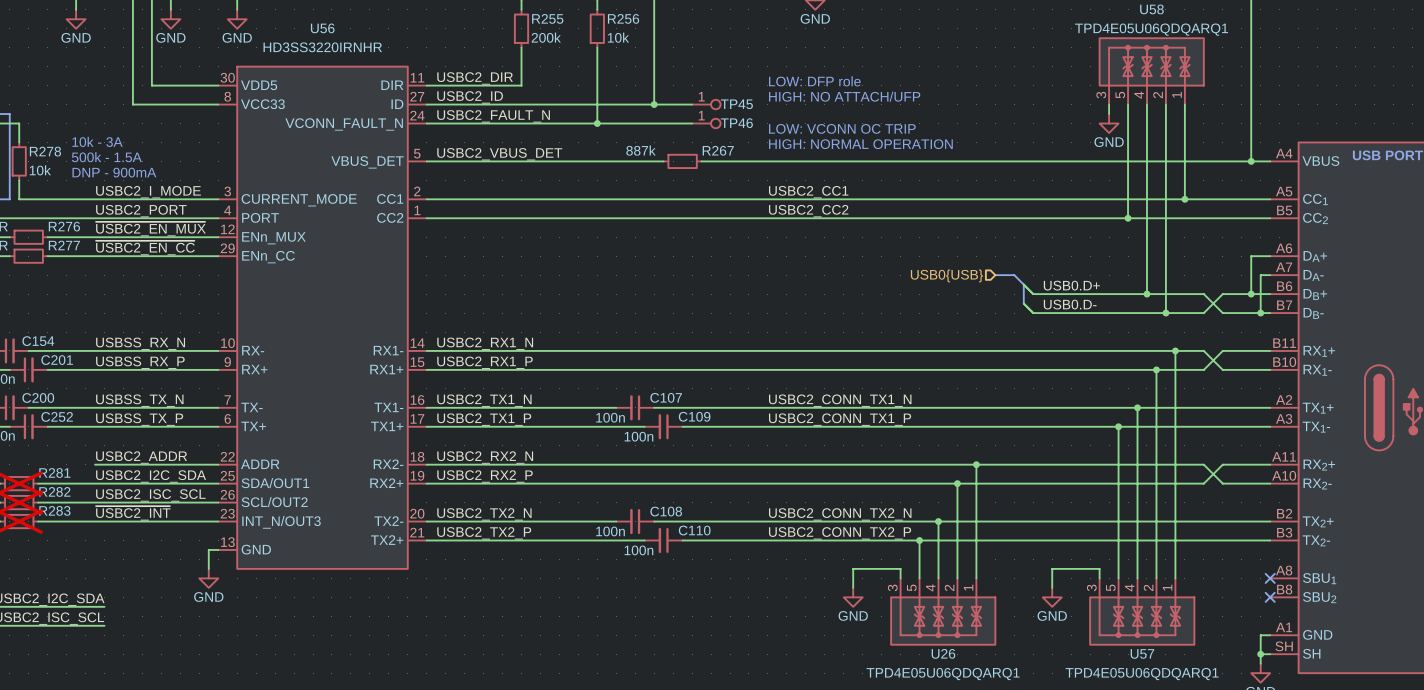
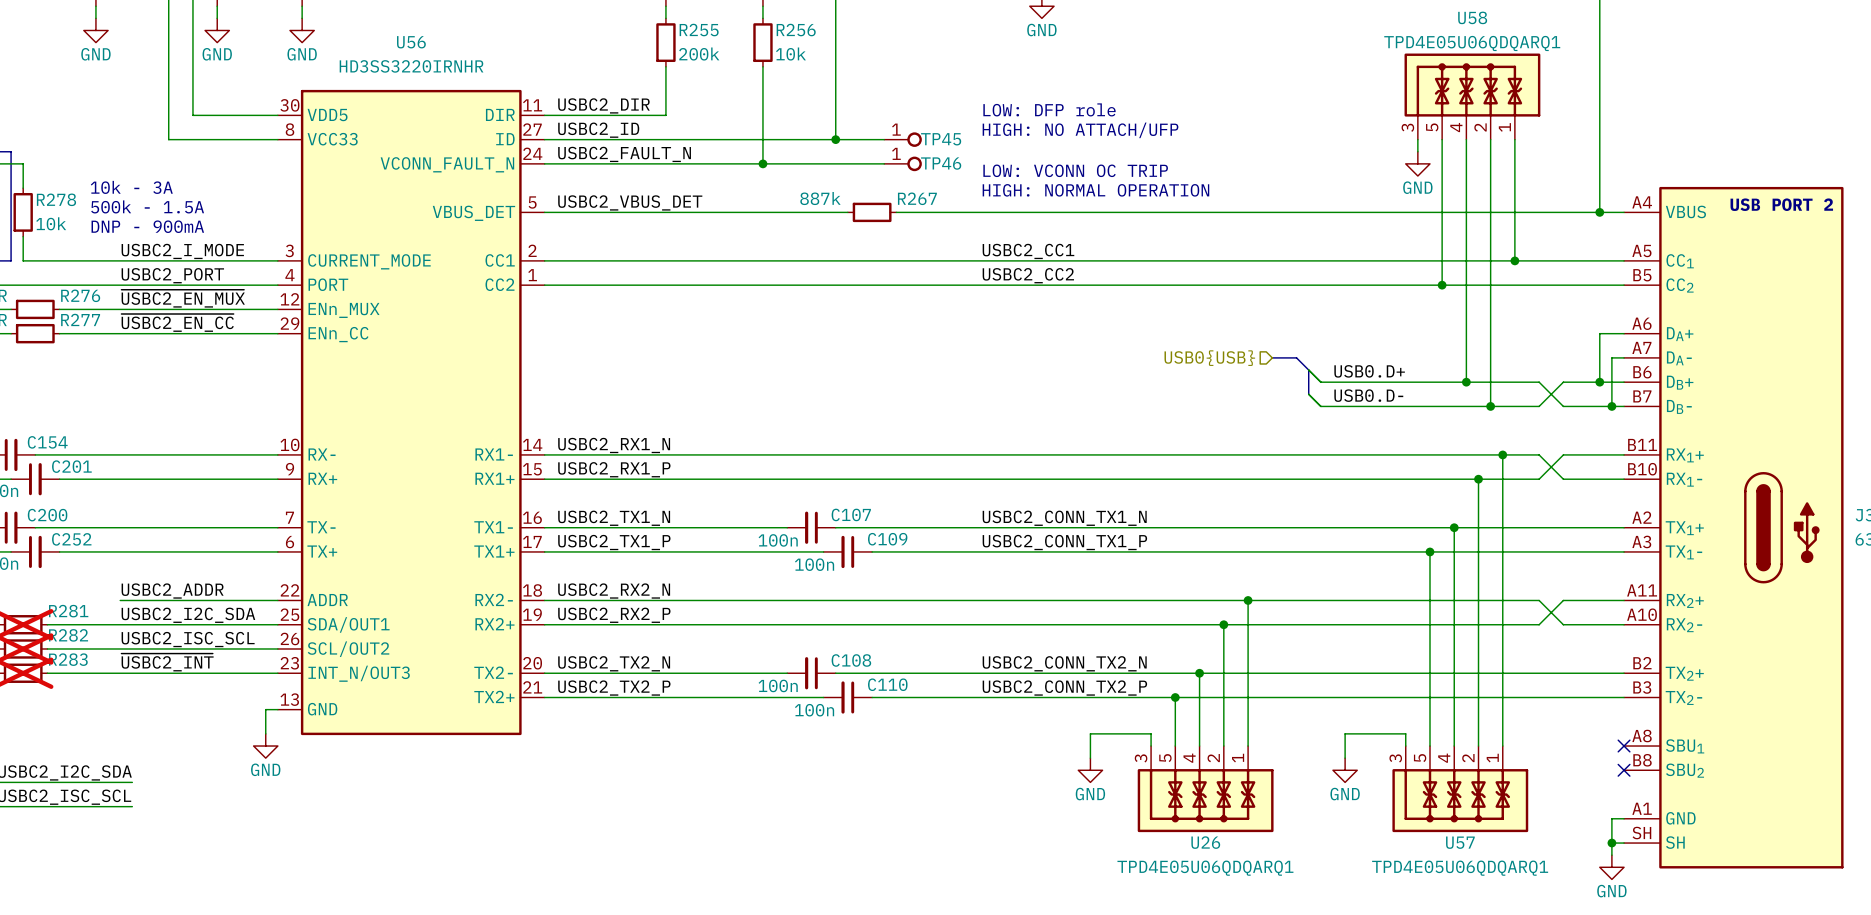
label: USBSS_RX_N (140, 343) -> none
label: USBSS_RX_P (140, 362) -> none
label: USBSS_TX_N (139, 400) -> none
label: USBSS_TX_P (139, 419) -> none

